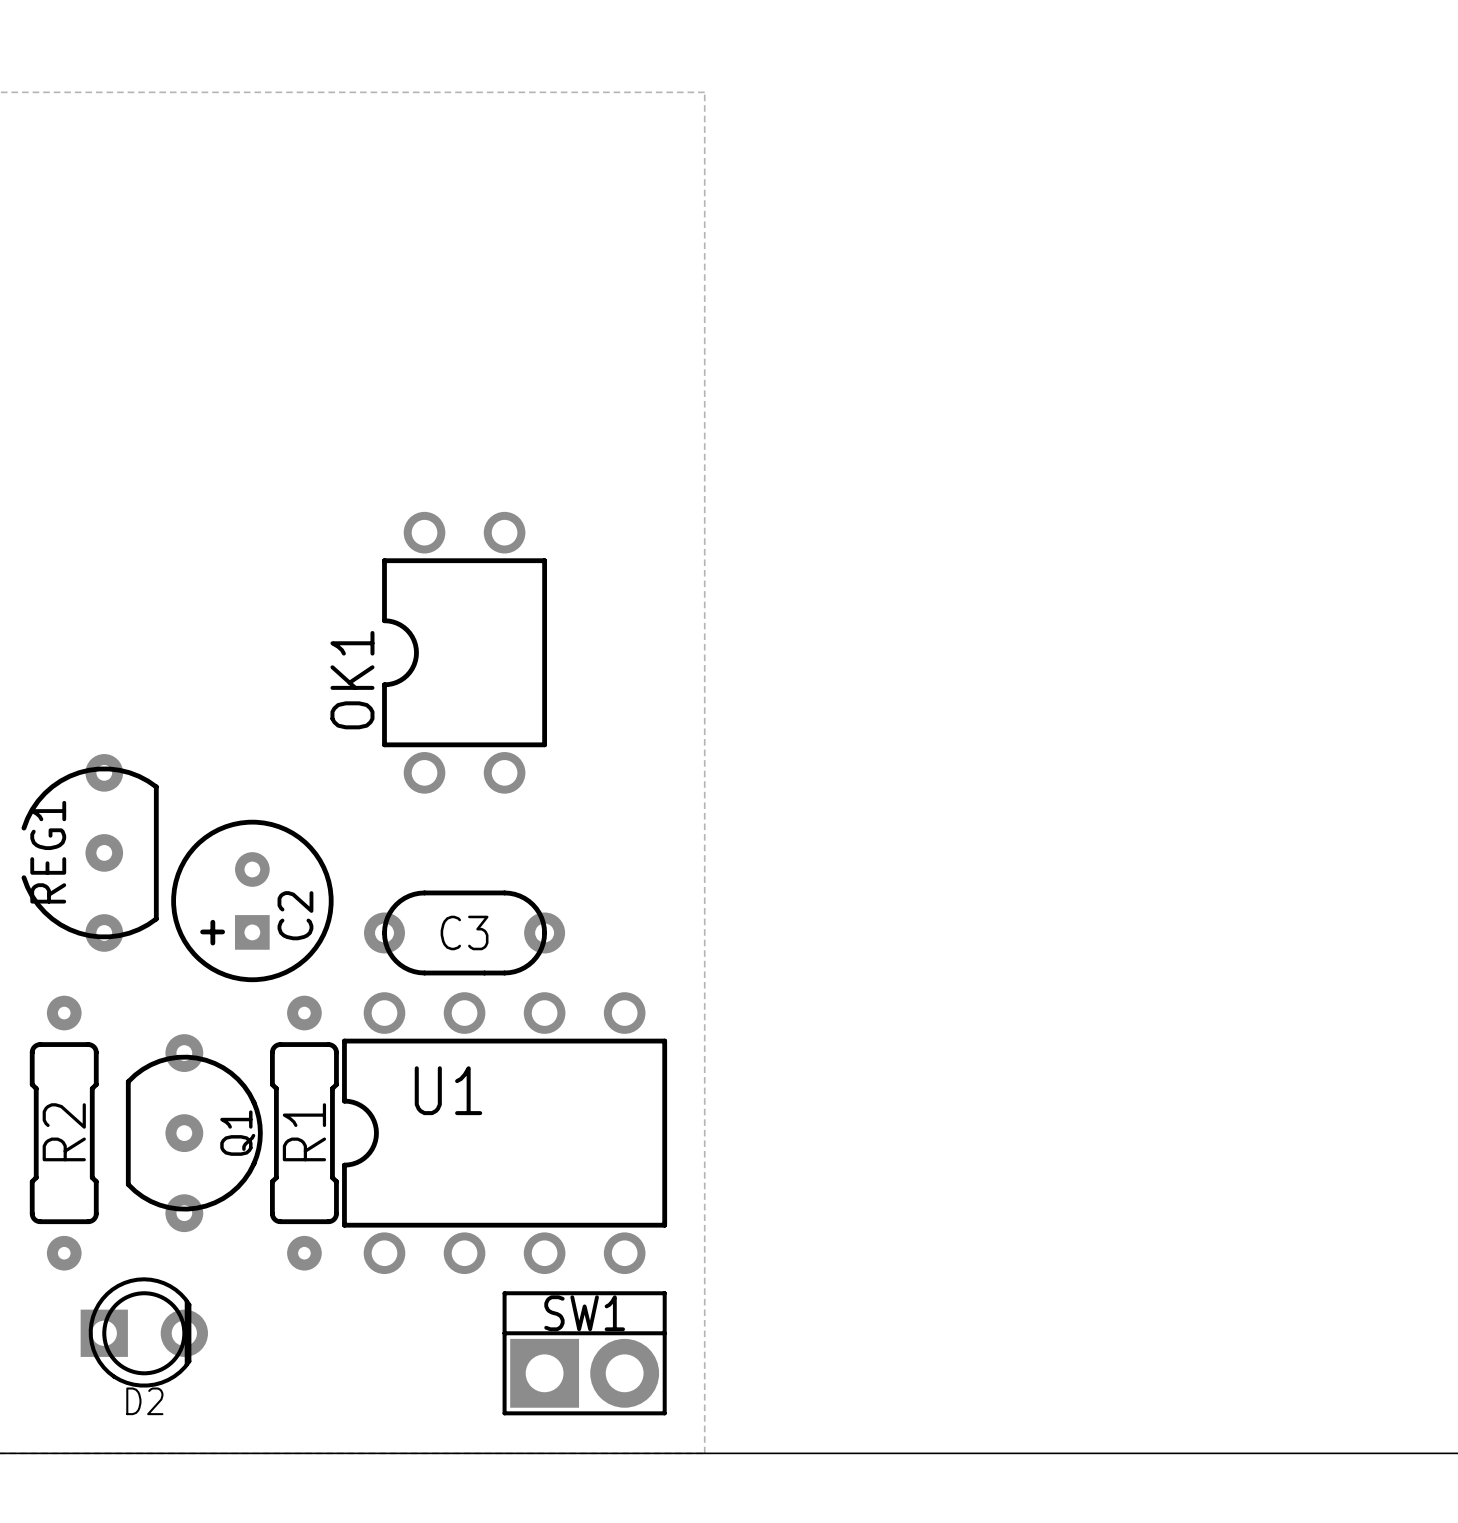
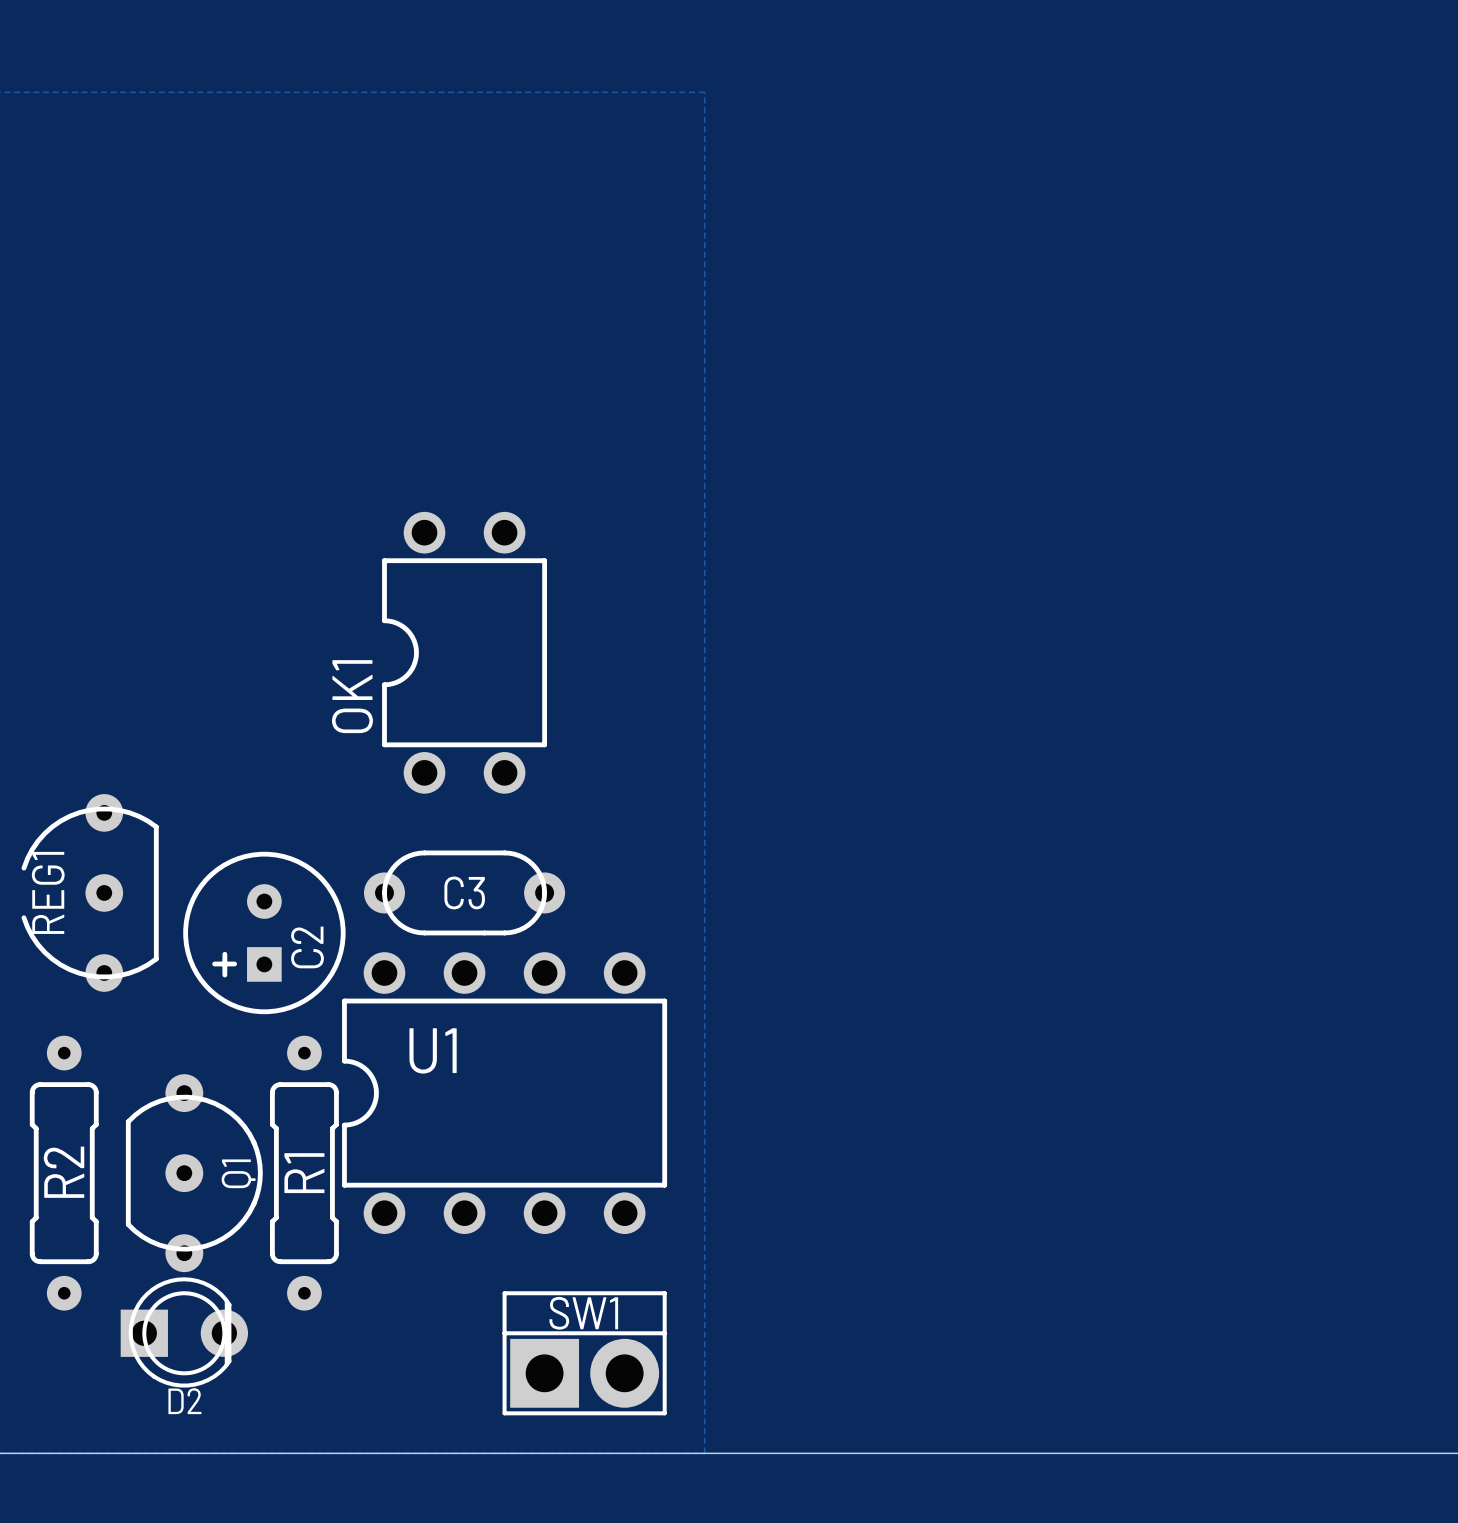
REG1 position: (90, 852) -> (90, 892)
C2 position: (252, 900) -> (264, 932)
C3 position: (464, 932) -> (464, 892)
R2 position: (64, 1133) -> (64, 1173)
Q1 position: (194, 1133) -> (194, 1173)
R1 position: (304, 1133) -> (304, 1173)
U1 position: (504, 1133) -> (504, 1093)
D2 position: (144, 1332) -> (184, 1332)

